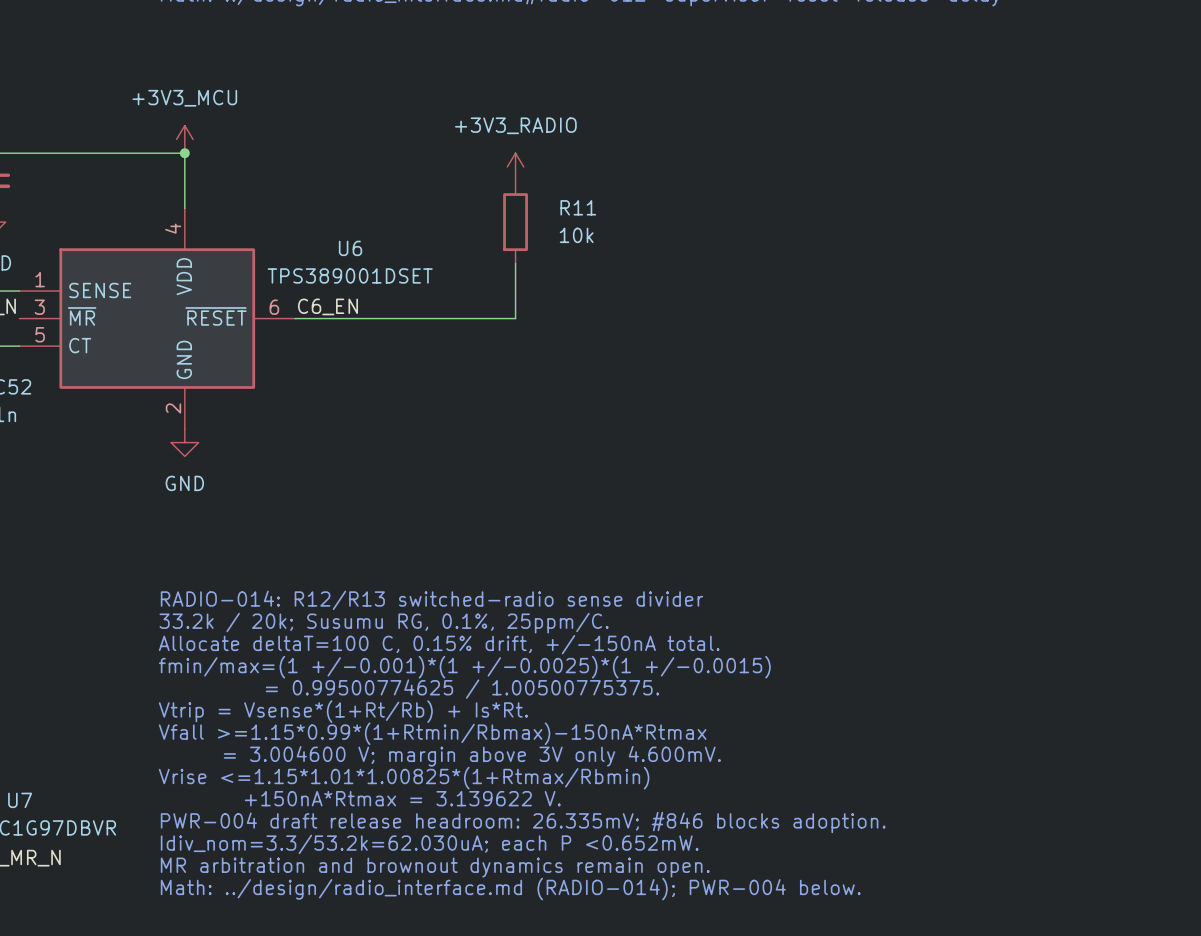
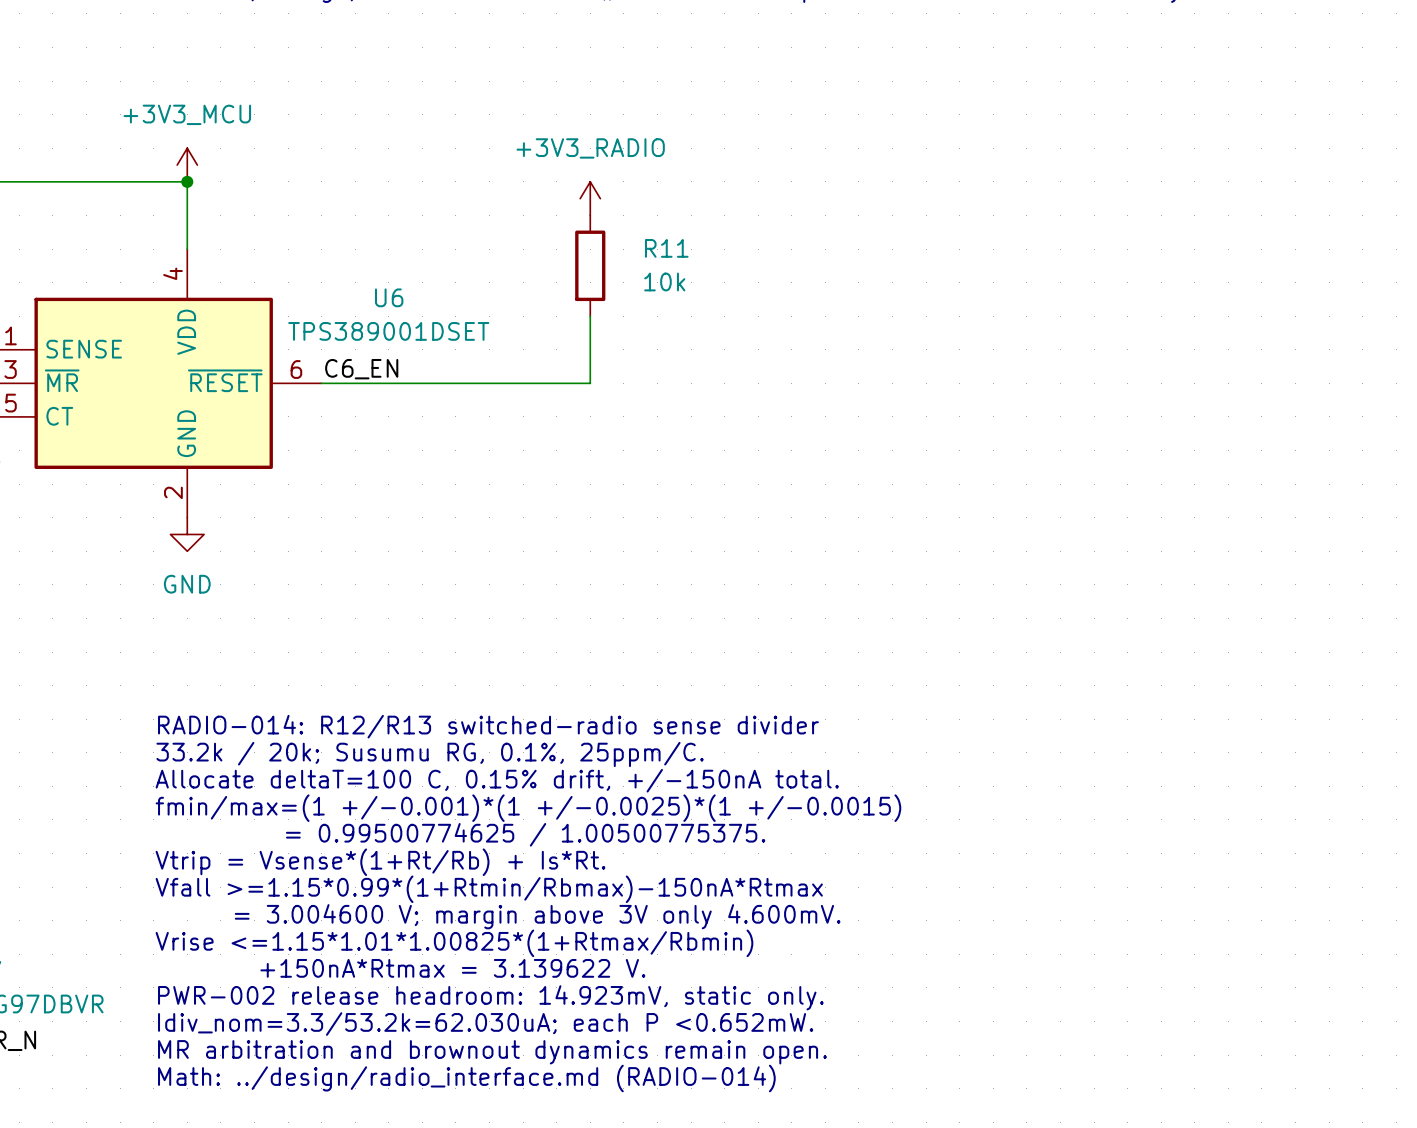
text: PWR-004 draft release headroom: 26.335mV; #846 blocks adoption. (523, 822) -> PWR-002 release headroom: 14.923mV, static only. (490, 997)
text: Math: ../design/radio_interface.md (RADIO-014); PWR-004 below. (510, 889) -> Math: ../design/radio_interface.md (RADIO-014) (466, 1078)

